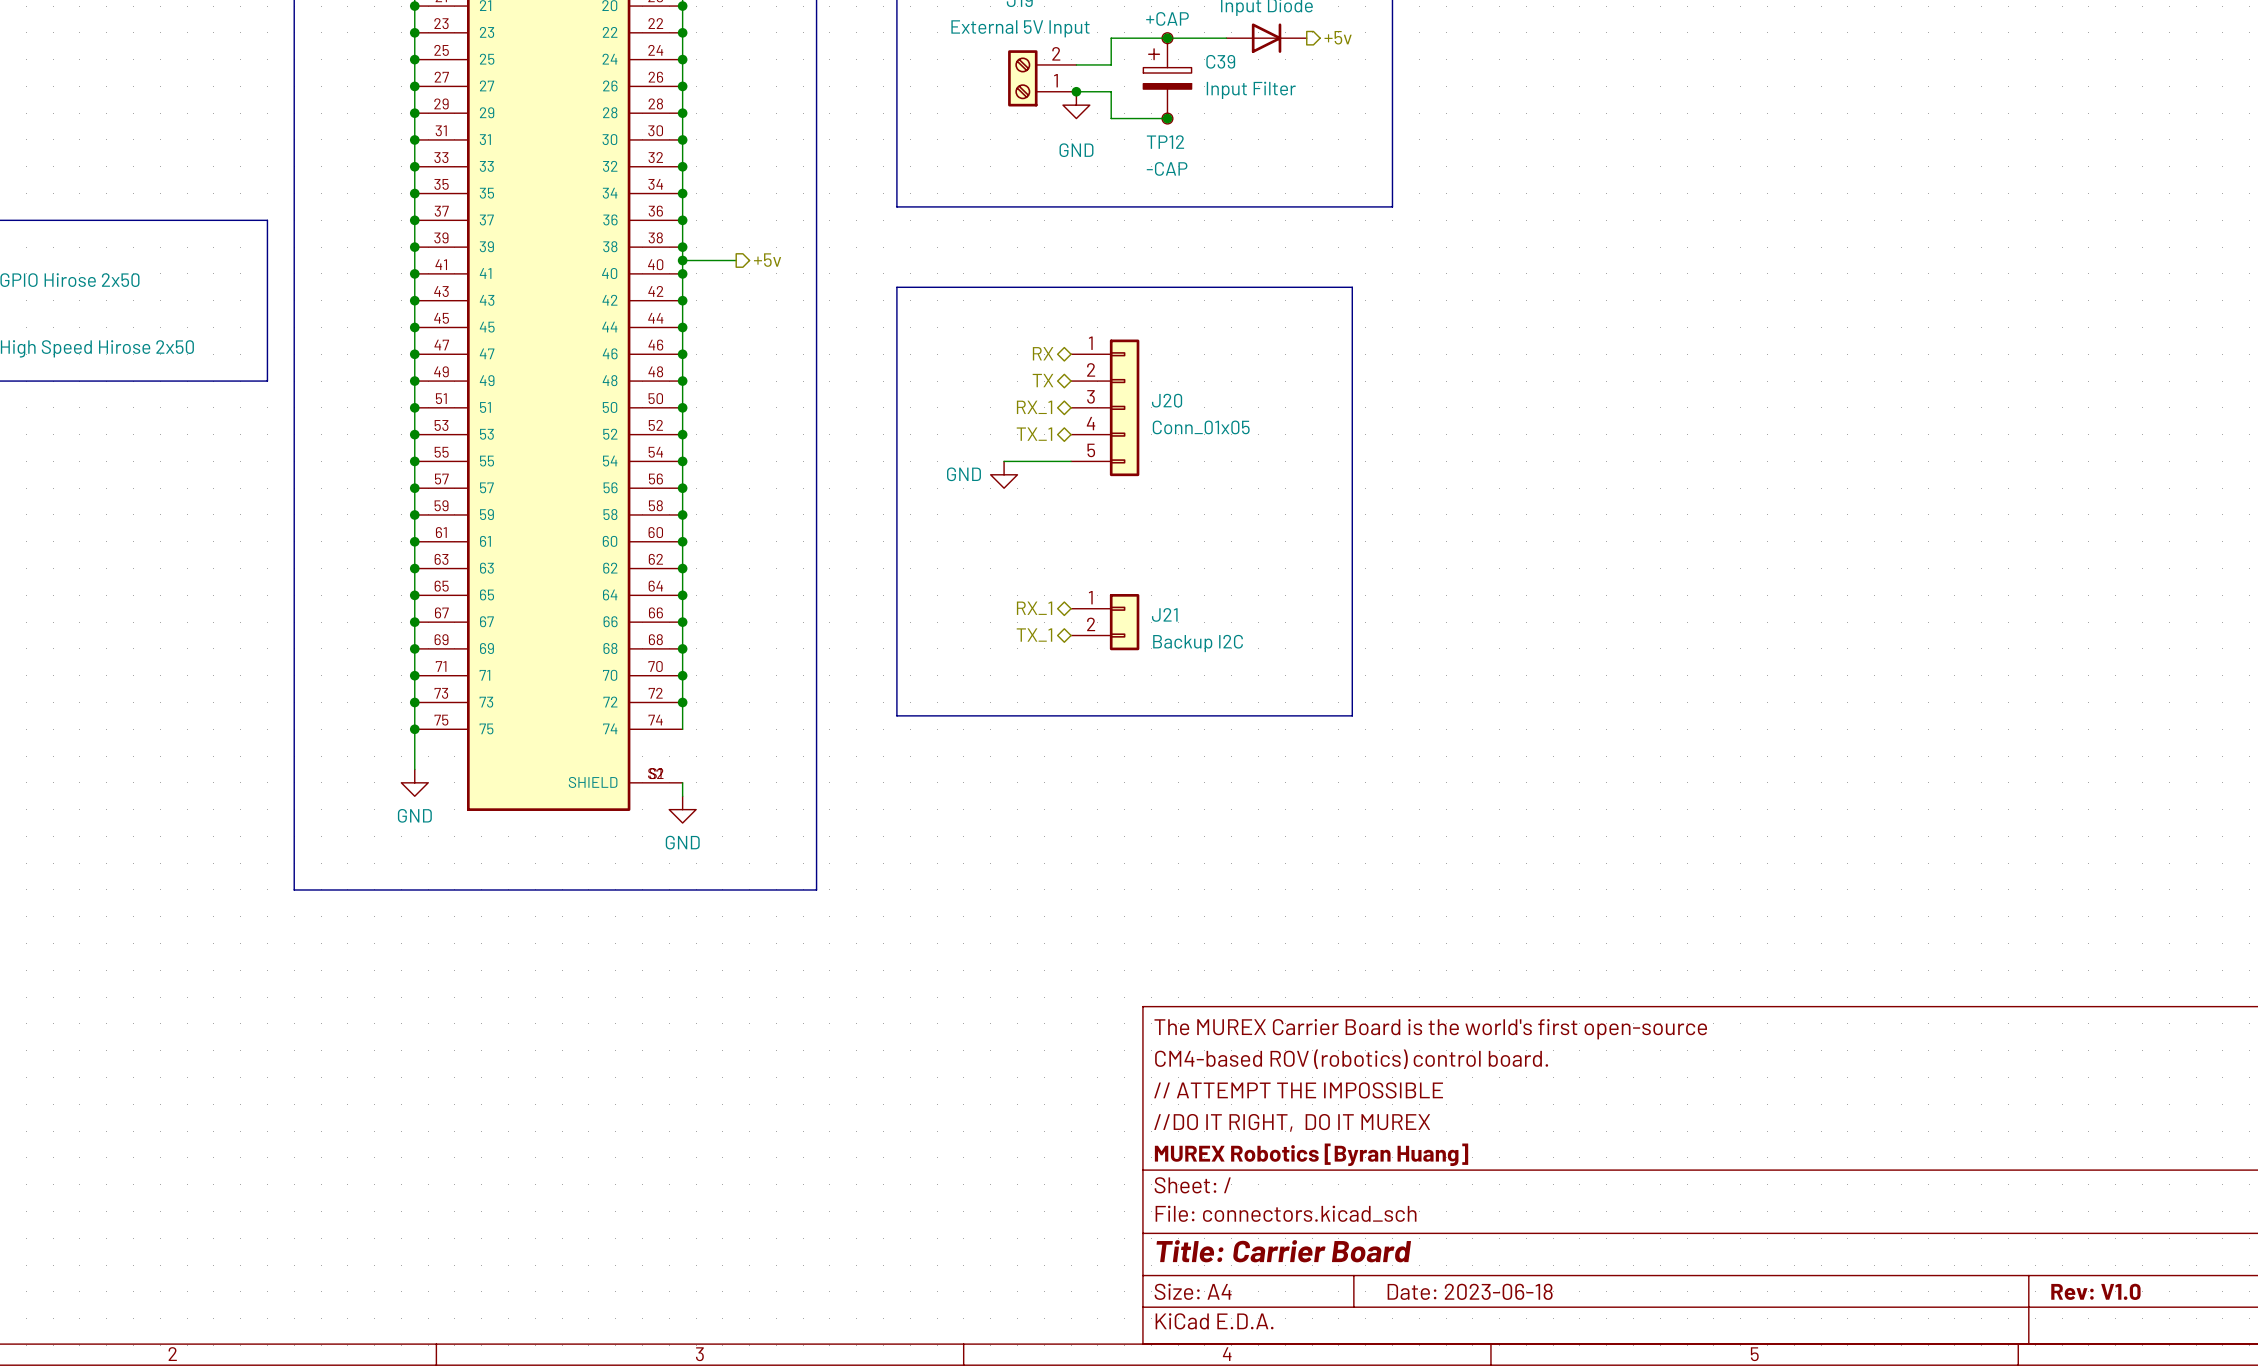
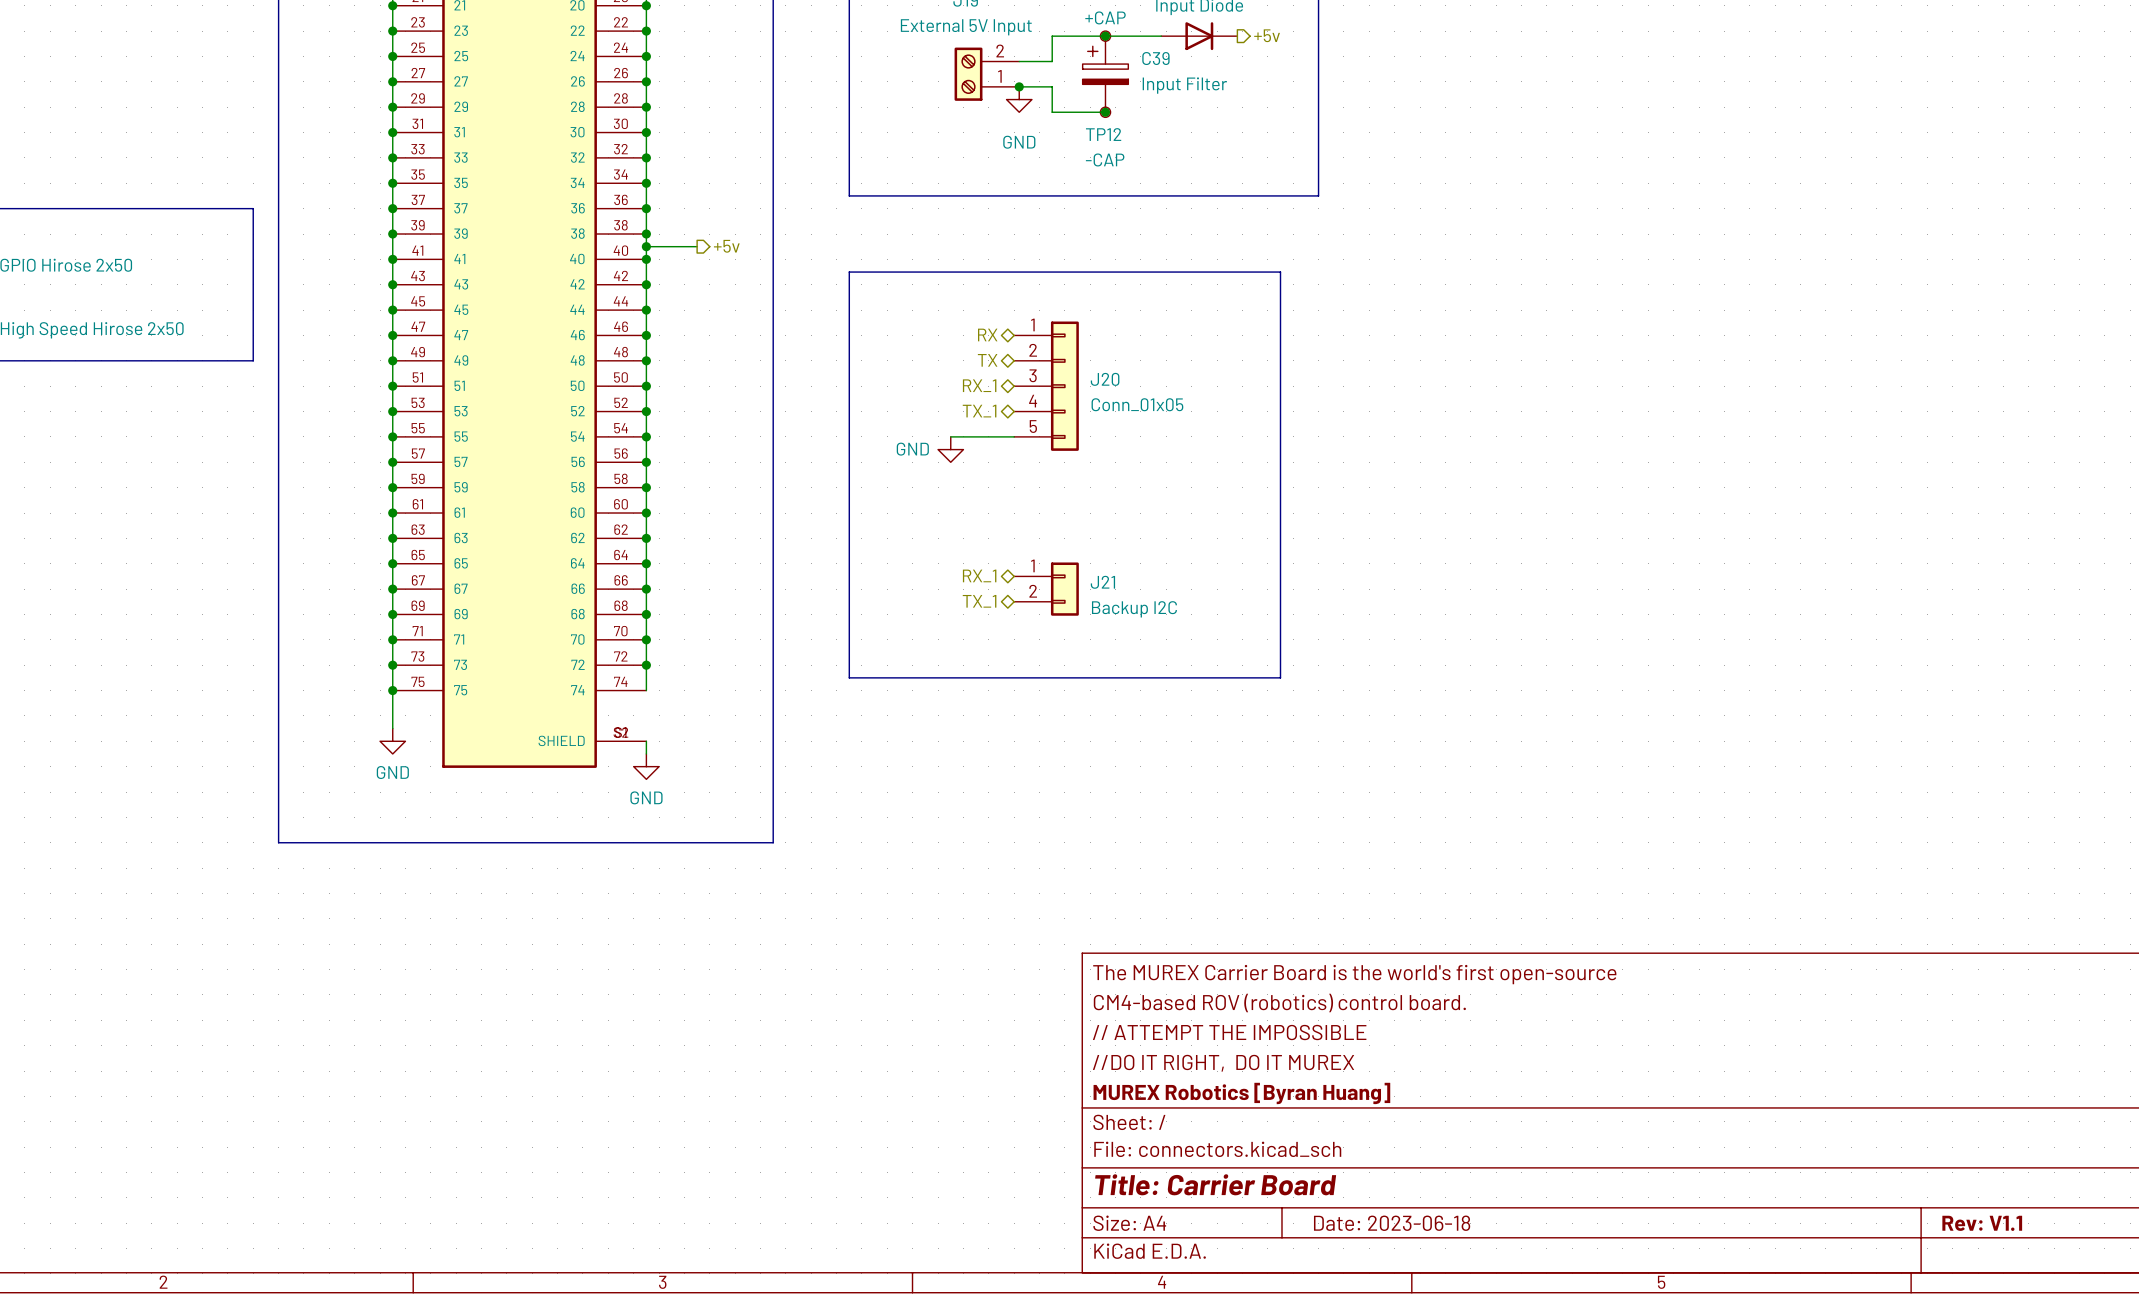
title block: Rev: V1.0 (2095, 1291) -> Rev: V1.1 (1982, 1223)

